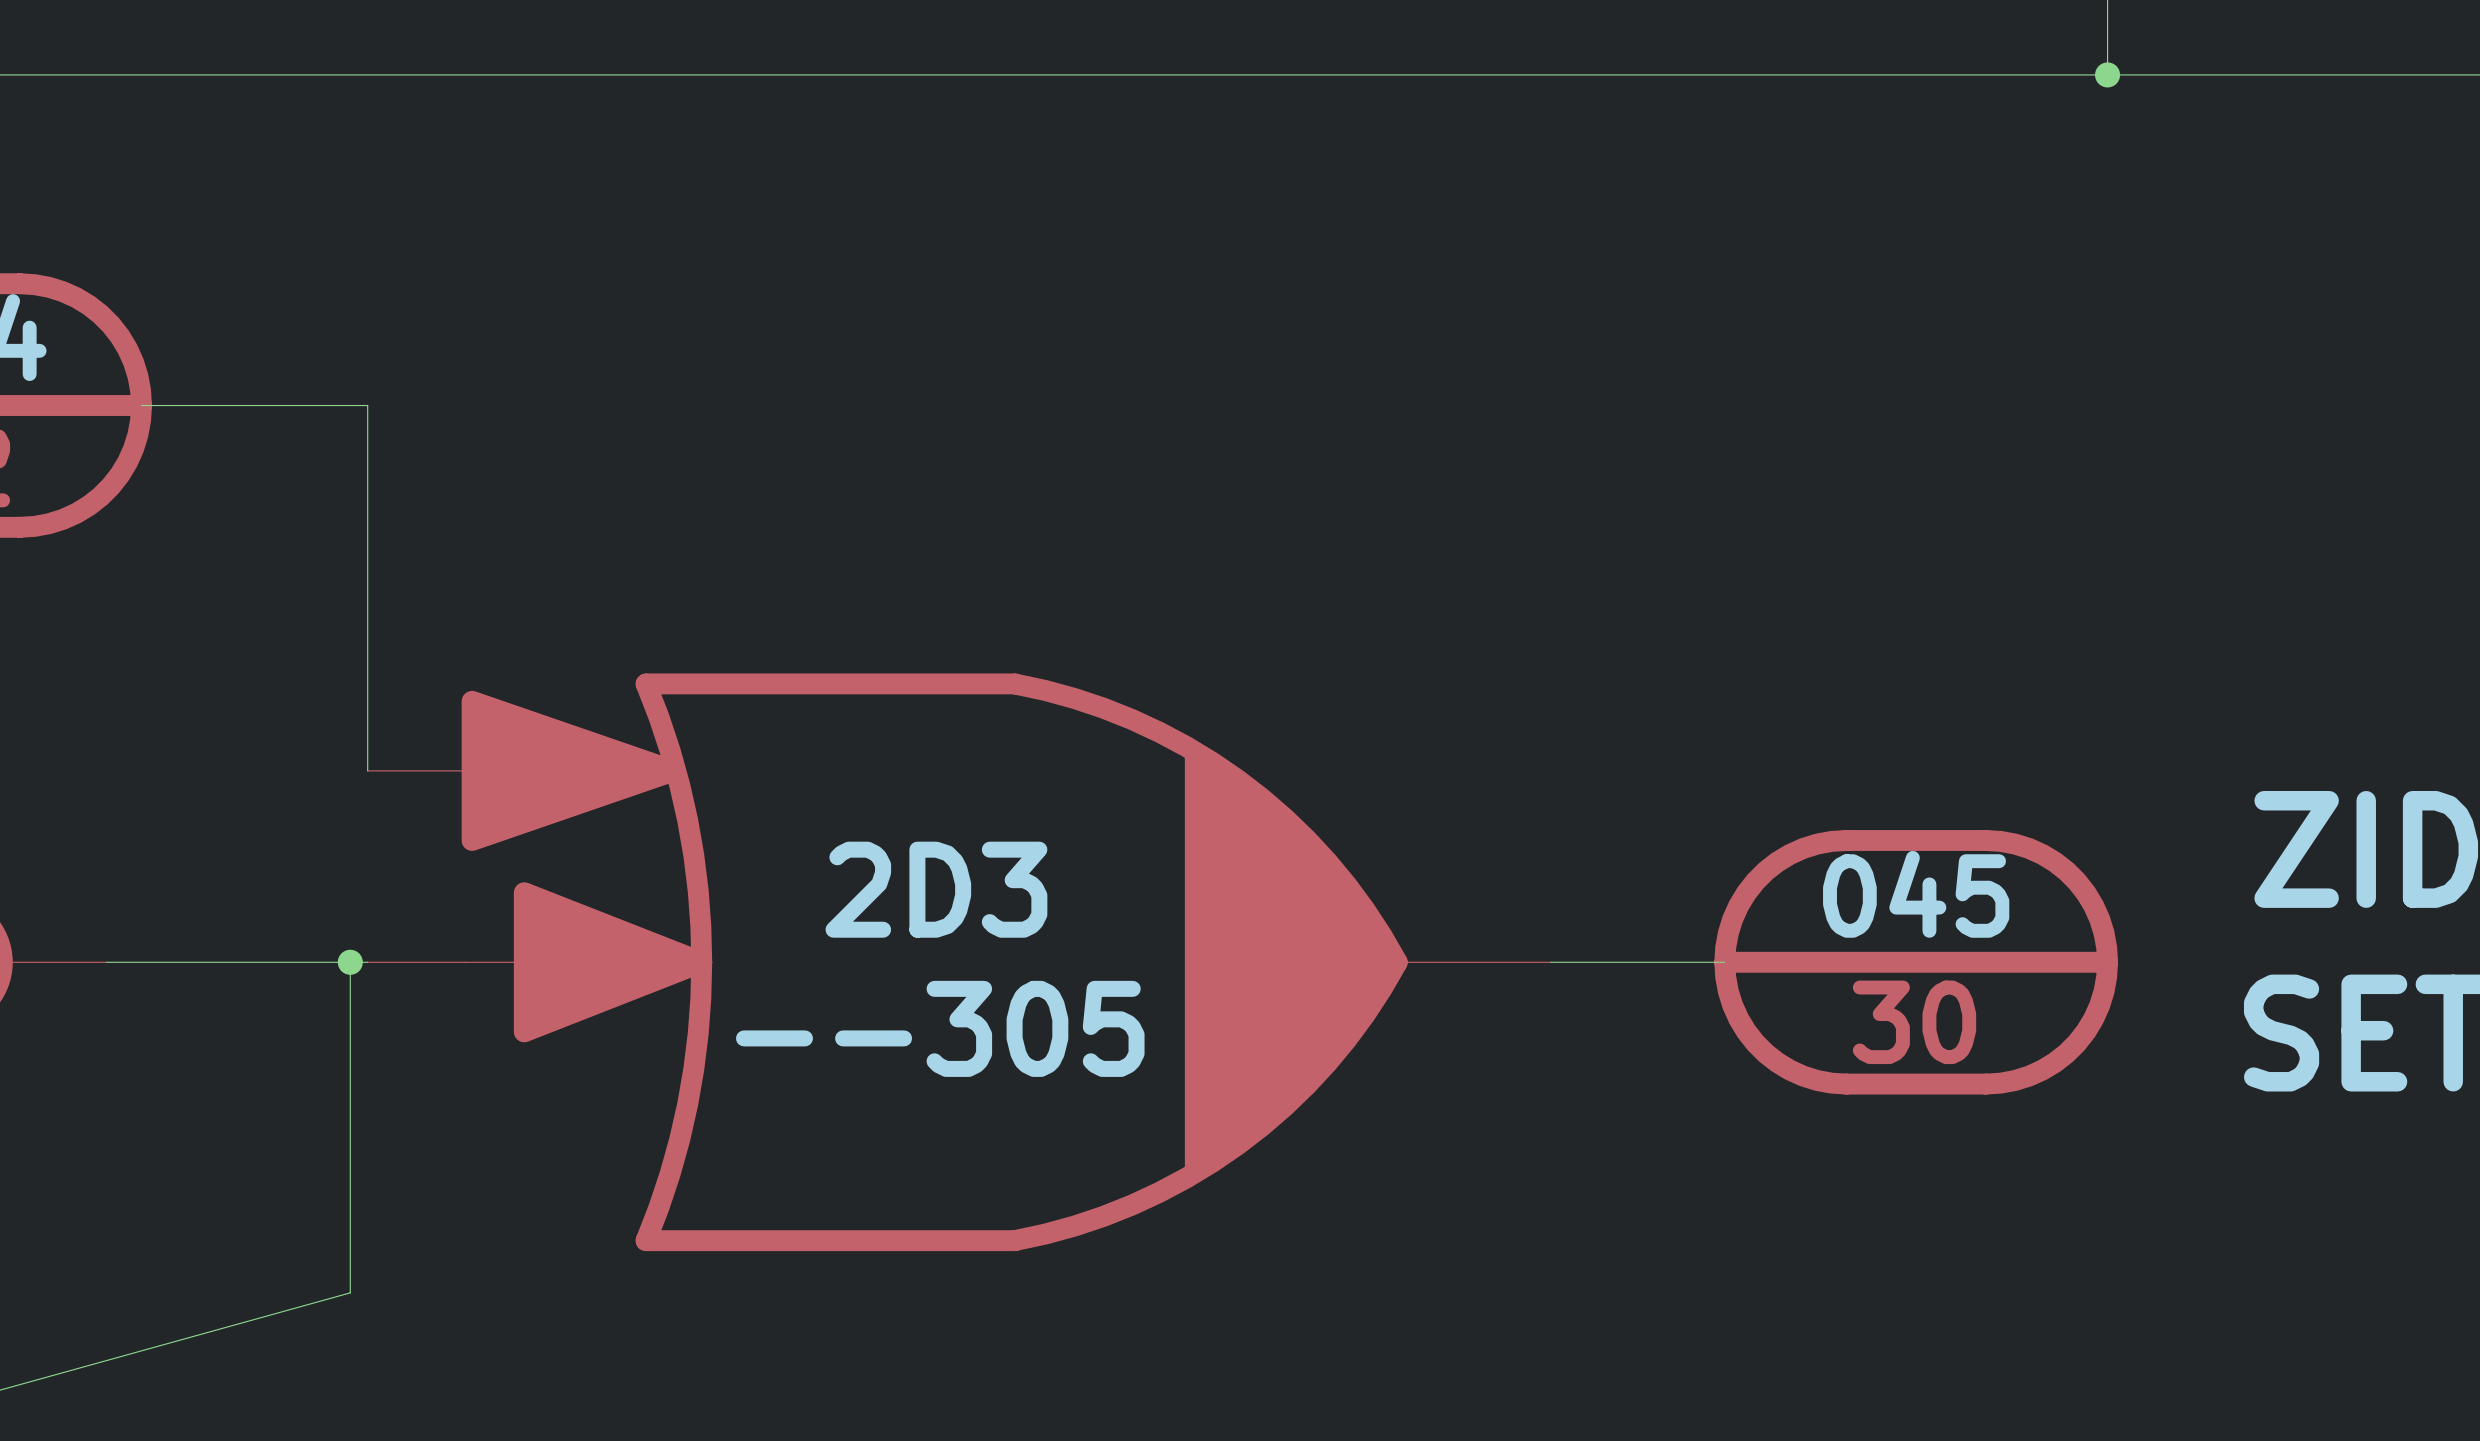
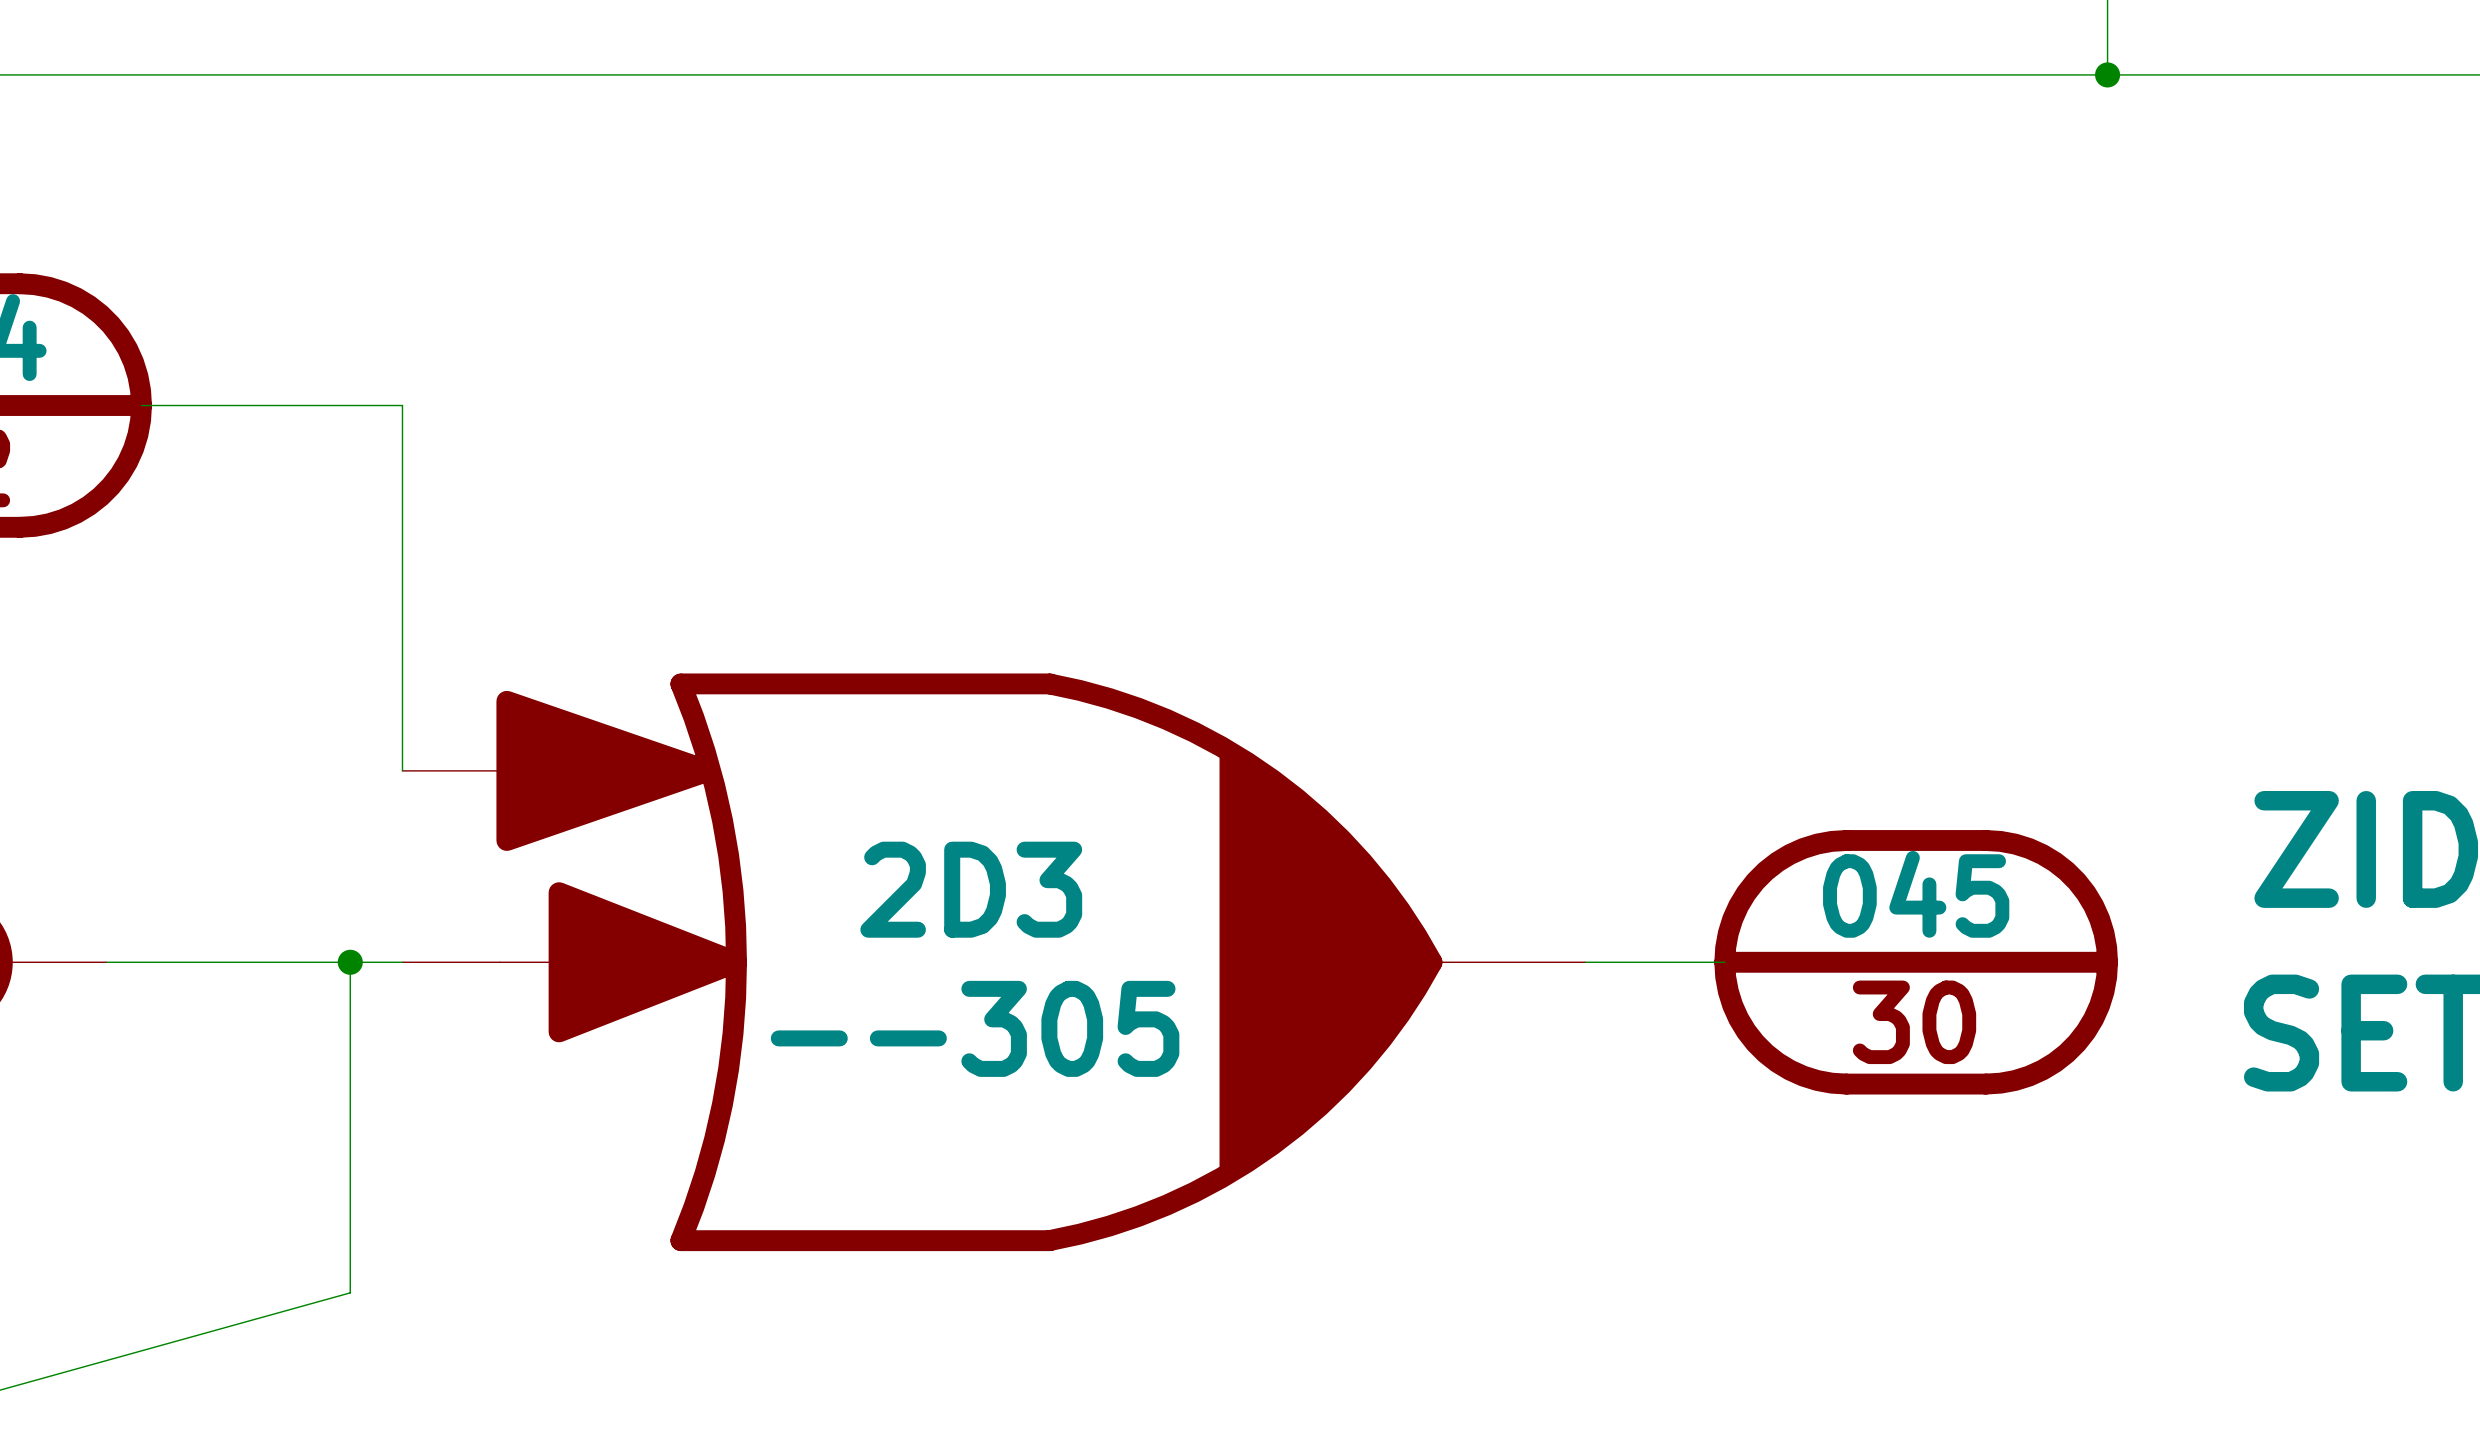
wire: (367, 405) (367, 770) -> (367, 405) (402, 405) (402, 770)
part position: (959, 962) -> (994, 962)

